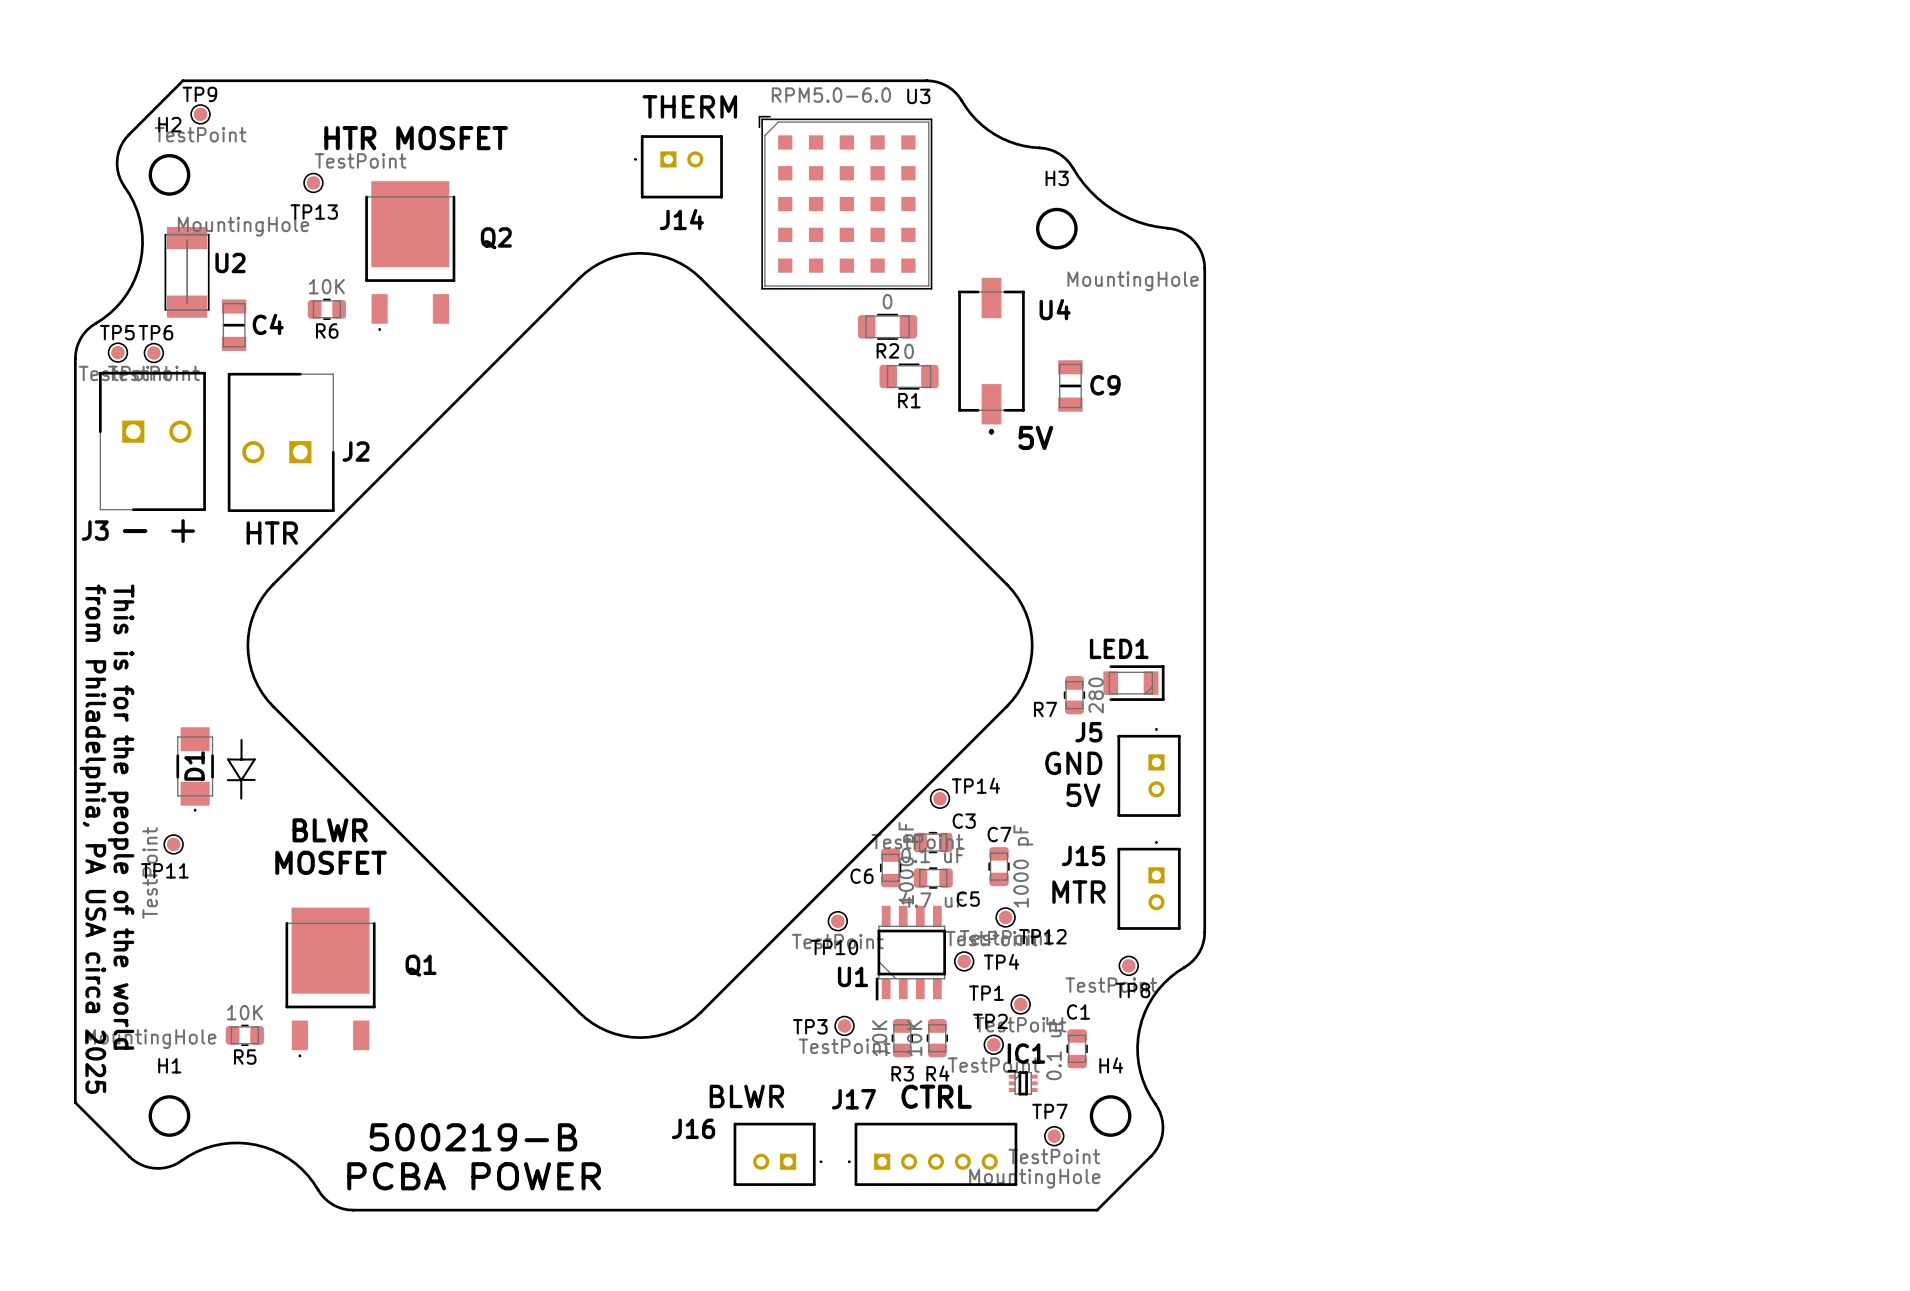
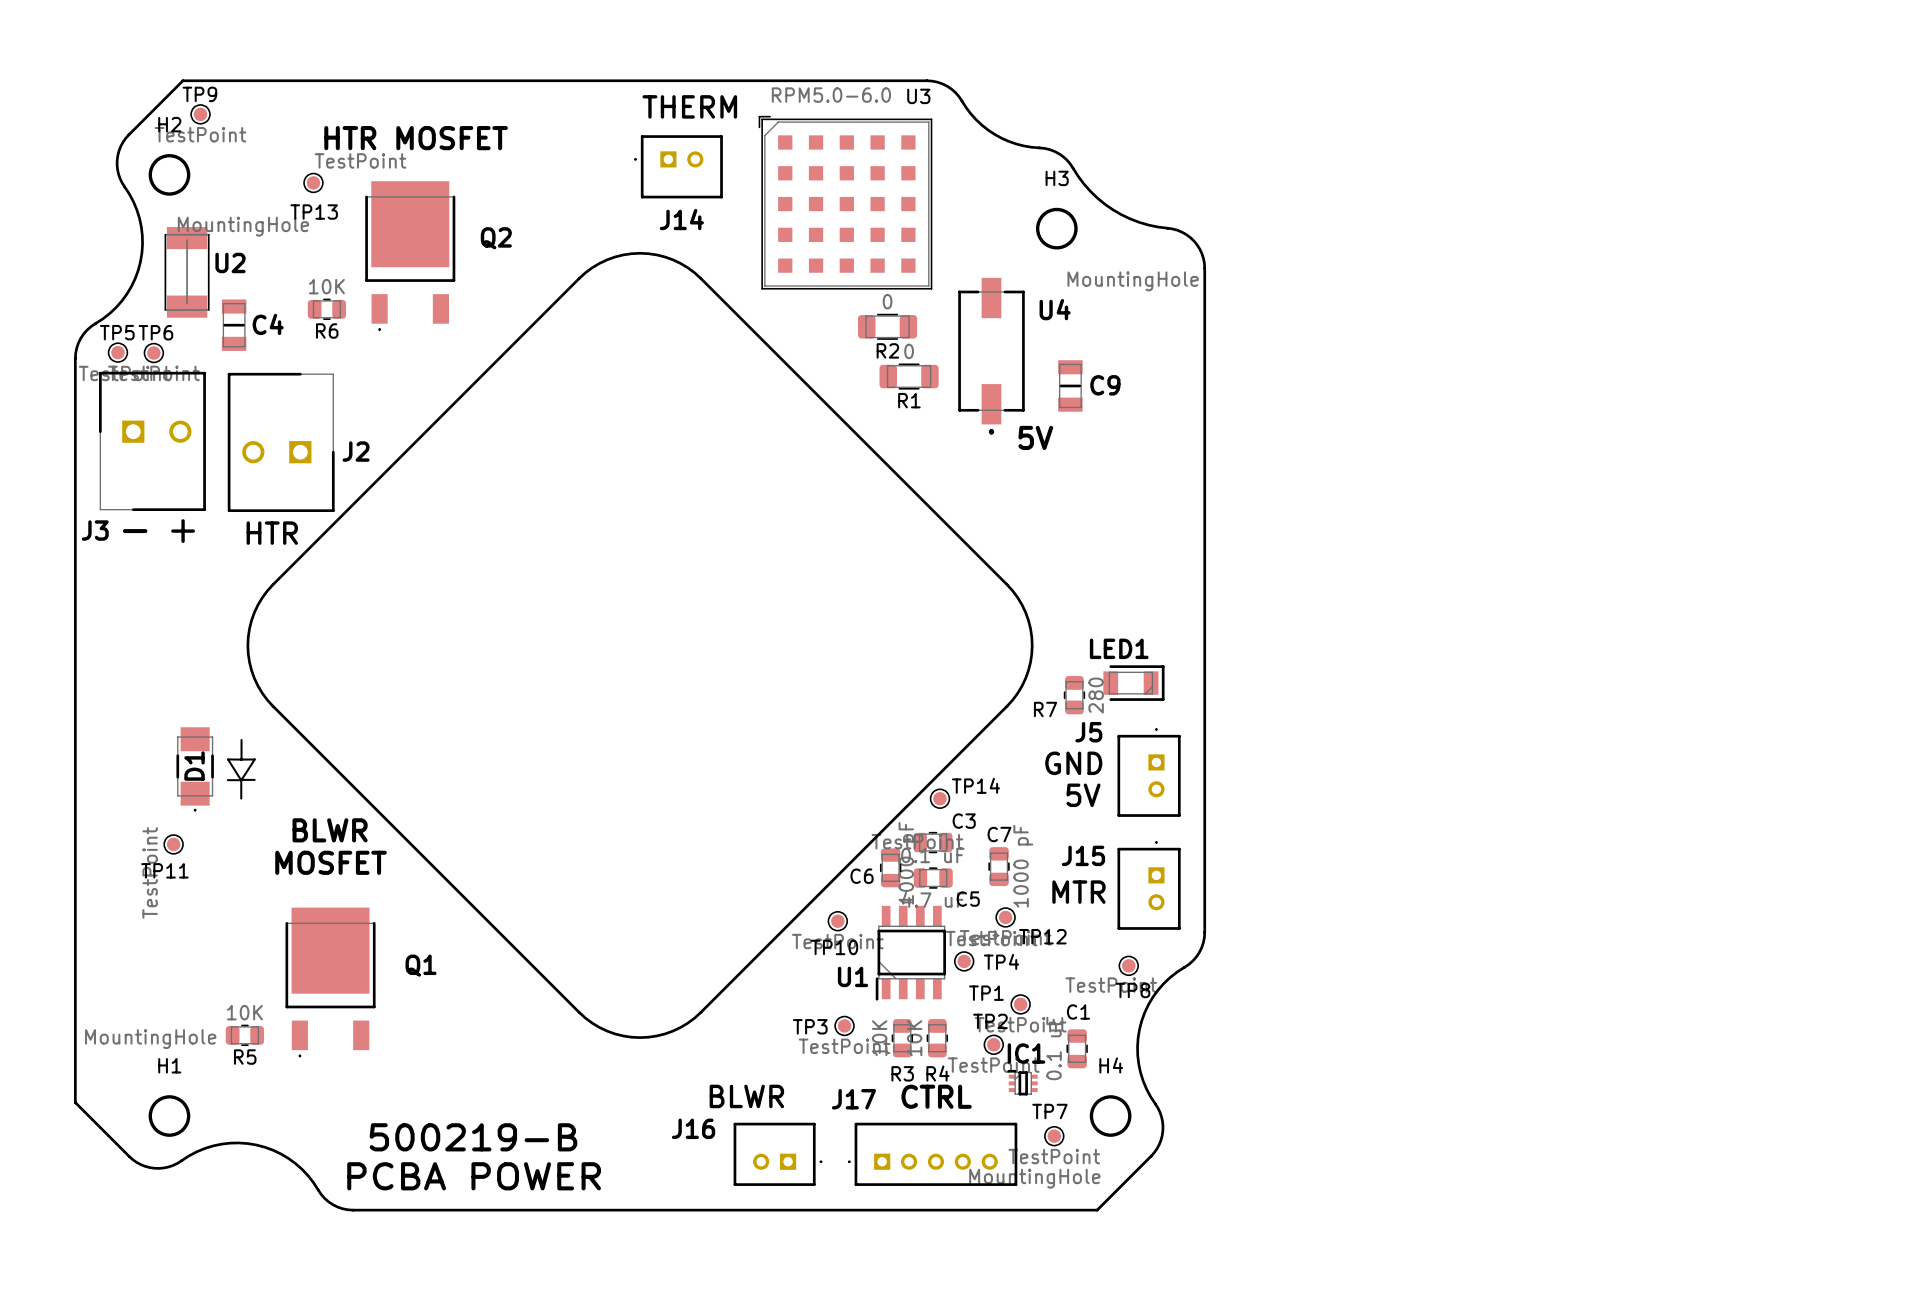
text: This is for the people of the world (121, 817) -> none
text: from Philadelphia, PA USA circa 2025 (92, 839) -> none

